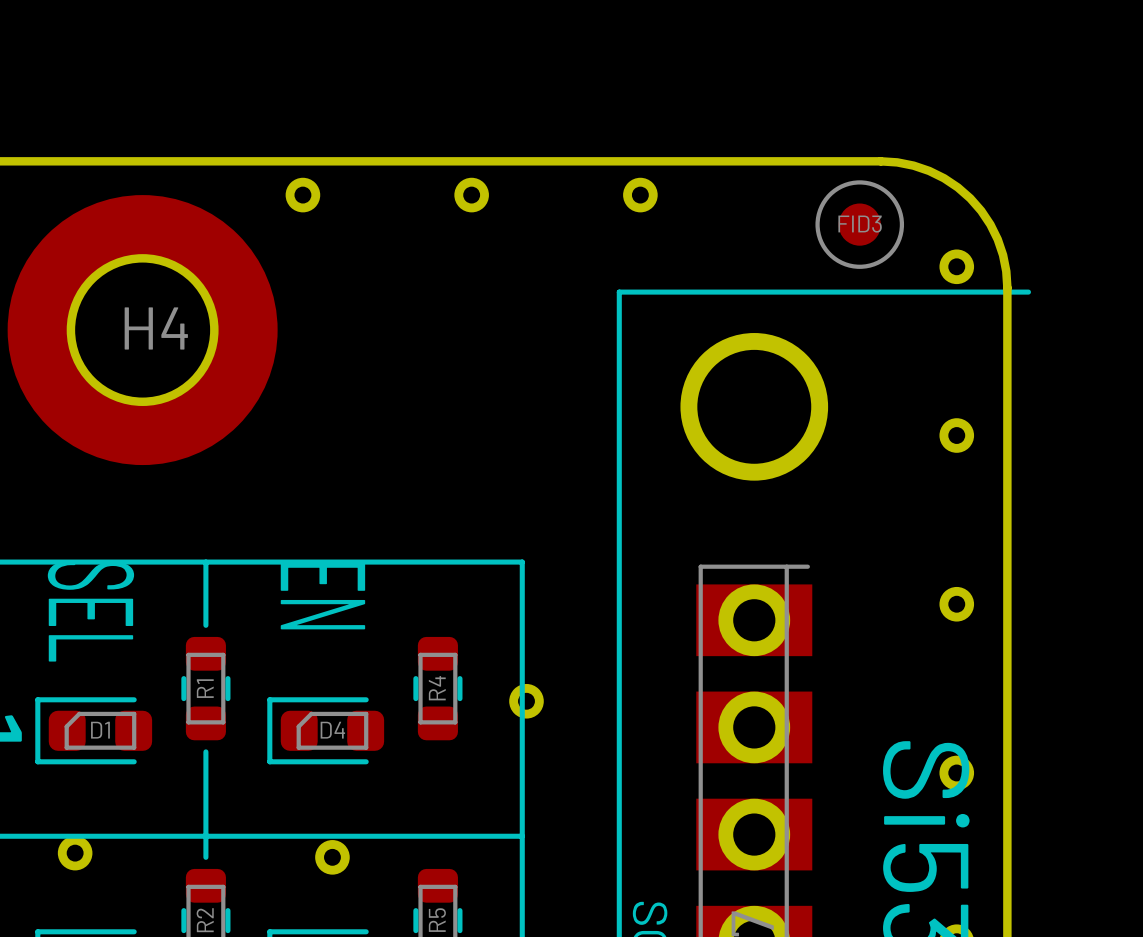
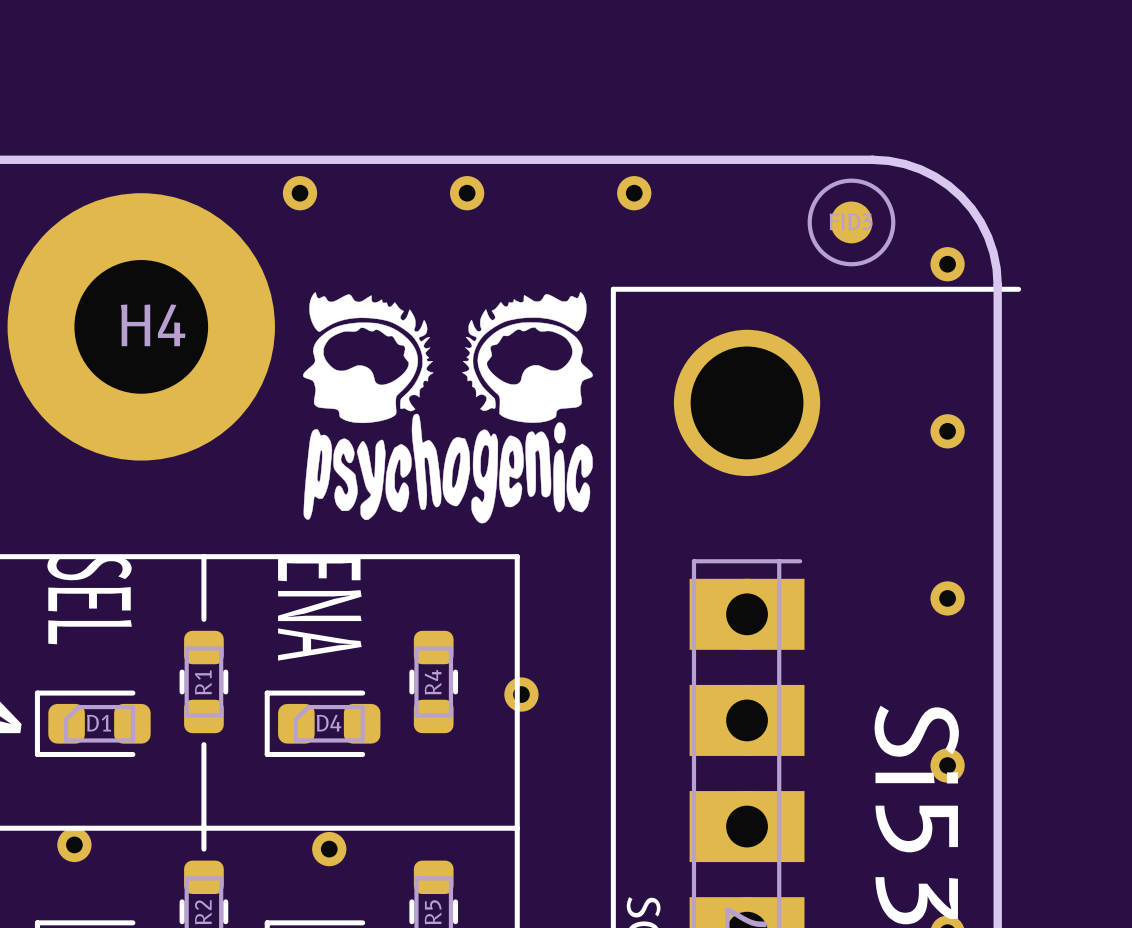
drawing: none -> [303, 291, 593, 524]
text: EN (322, 596) -> ENA (319, 608)

